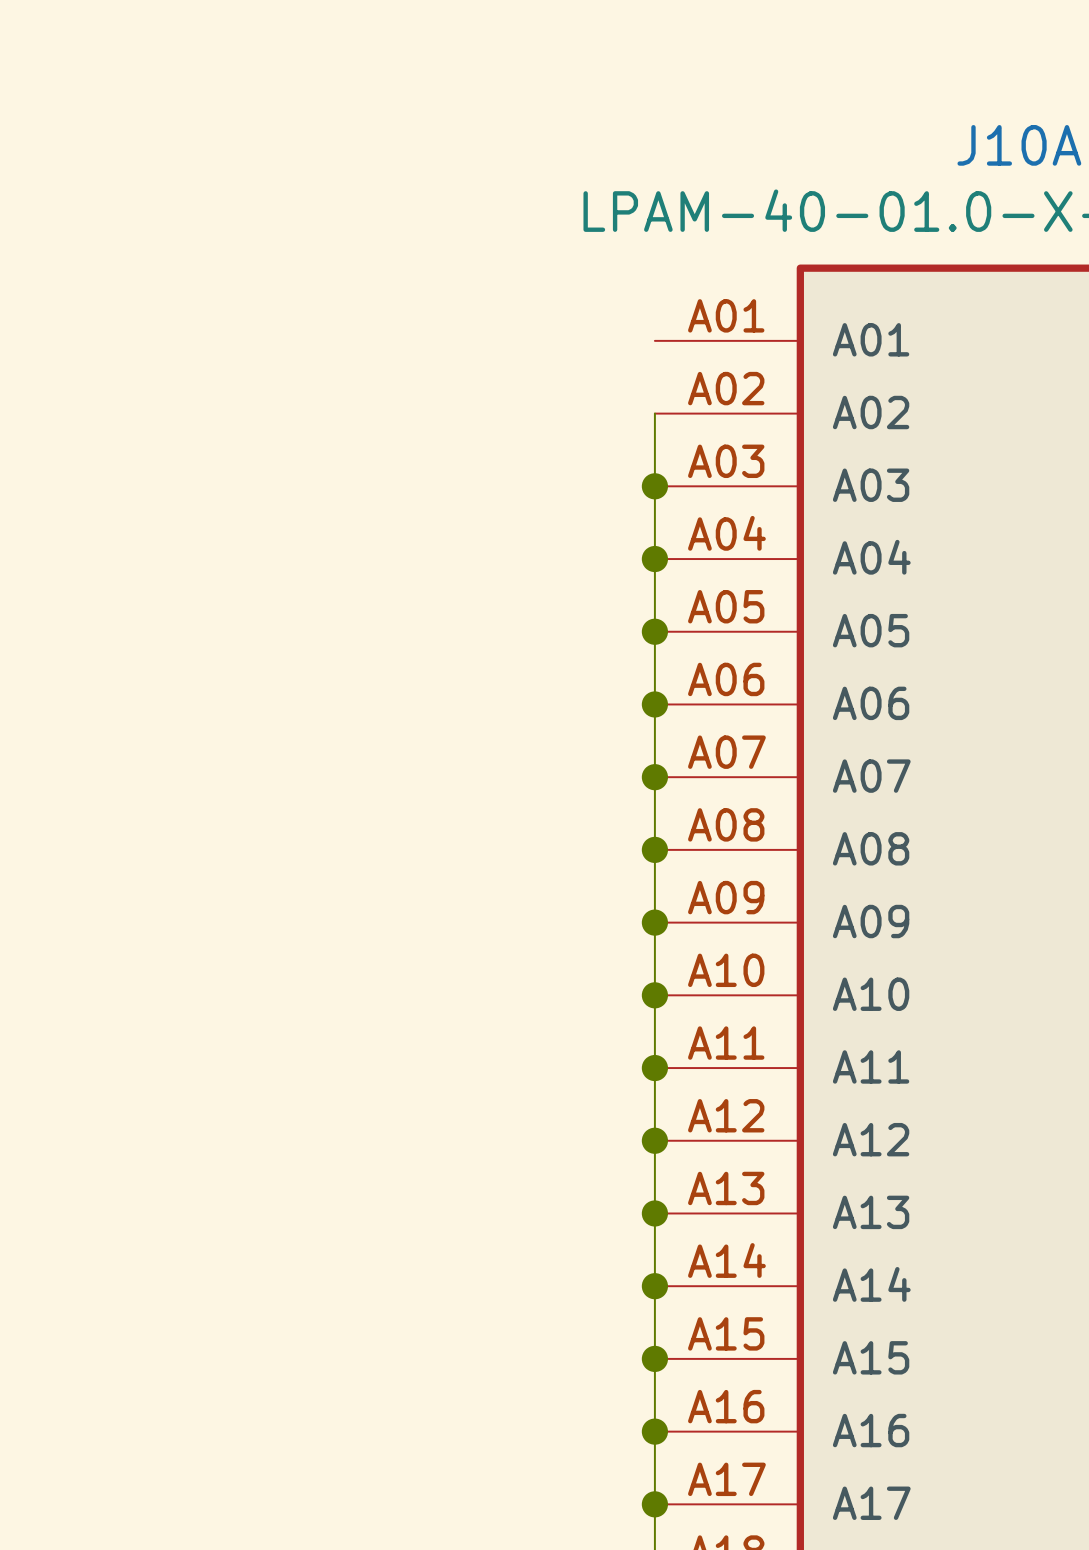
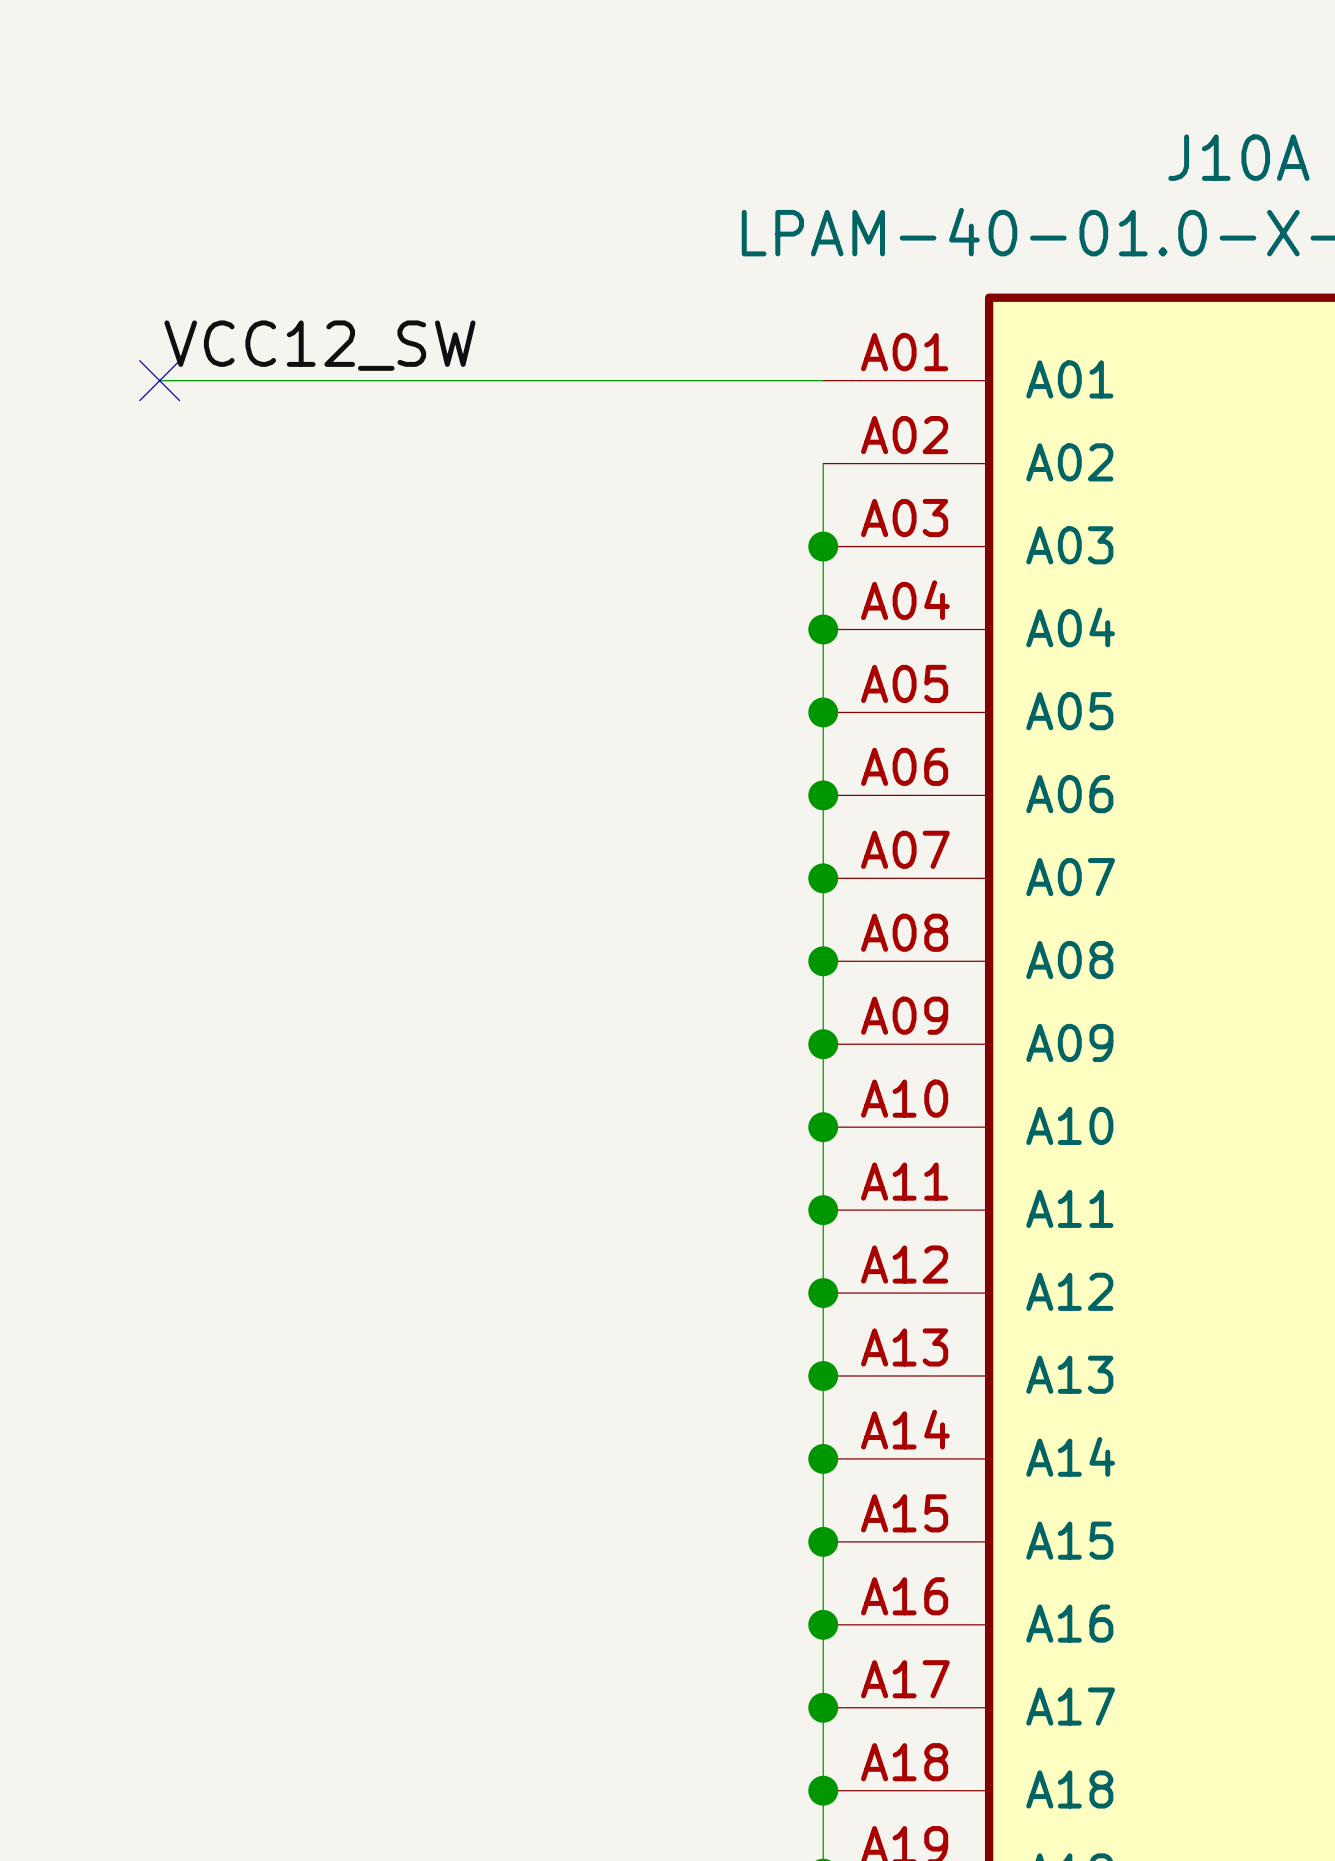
label: none -> VCC12_SW (319, 345)
wire: none -> (159, 380) (823, 380)
no-connect mark: none -> (159, 380)

